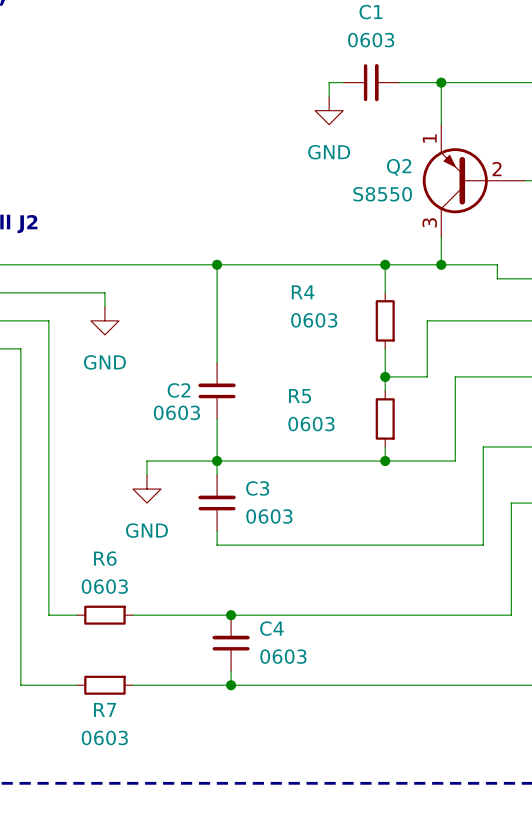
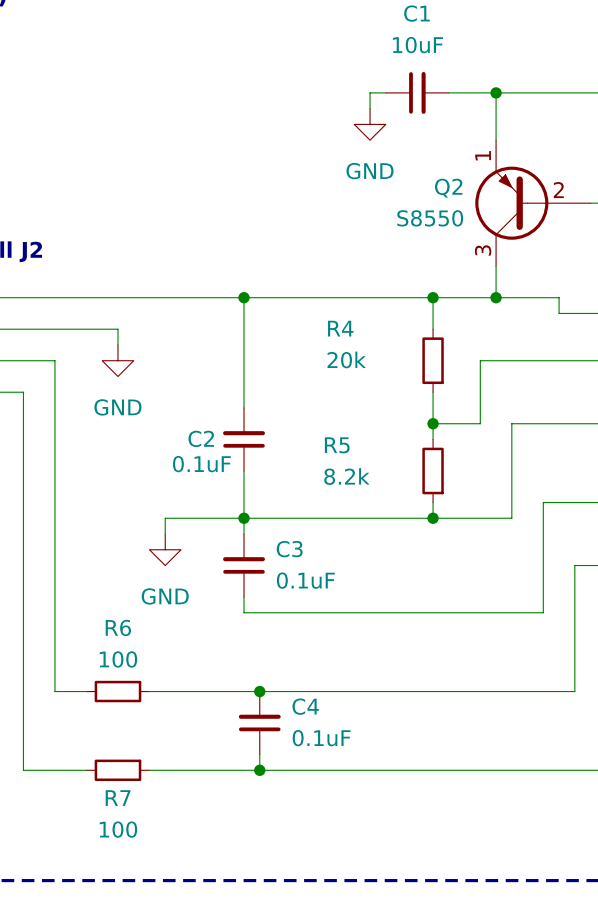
C1 value: 0603 (371, 40) -> 10uF (417, 45)
R4 value: 0603 (314, 320) -> 20k (346, 359)
C2 value: 0603 (176, 412) -> 0.1uF (201, 464)
R5 value: 0603 (311, 424) -> 8.2k (346, 476)
C3 value: 0603 (269, 516) -> 0.1uF (305, 580)
R6 value: 0603 (104, 586) -> 100 (118, 659)
C4 value: 0603 (283, 656) -> 0.1uF (321, 738)
R7 value: 0603 (104, 737) -> 100 (118, 829)

